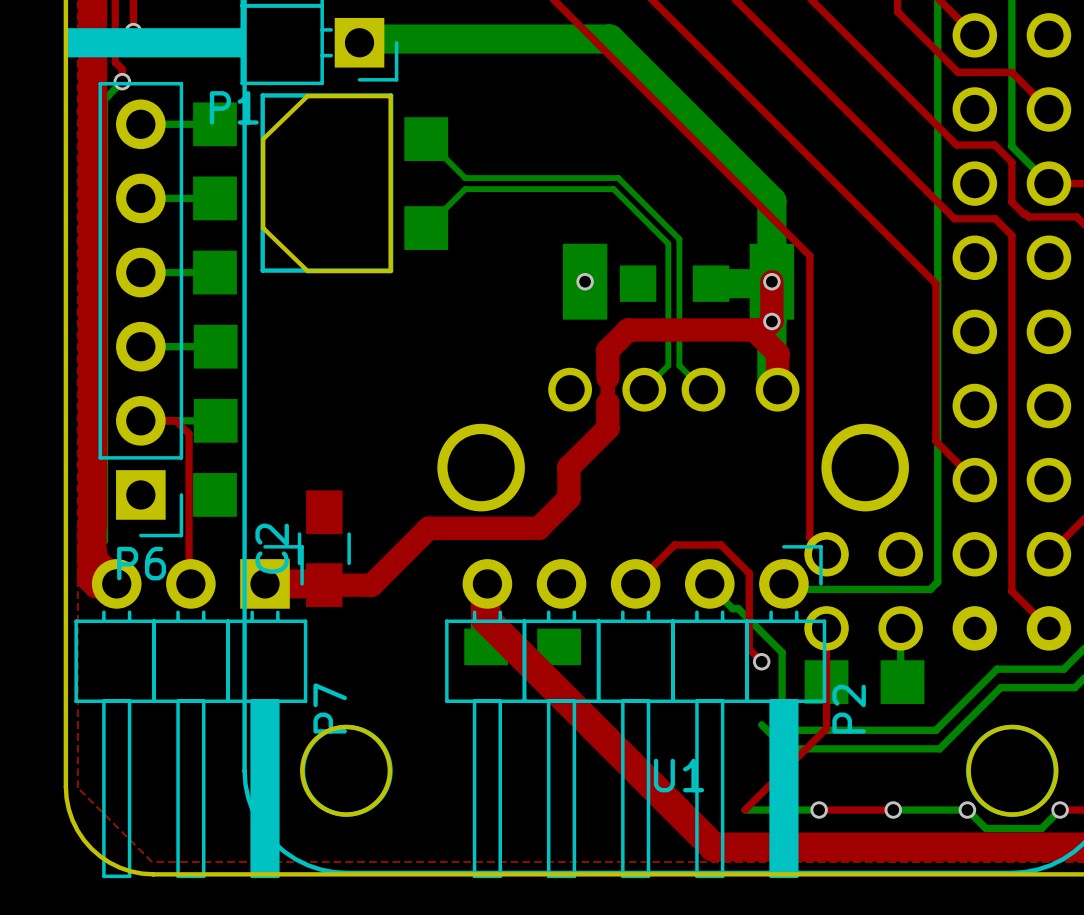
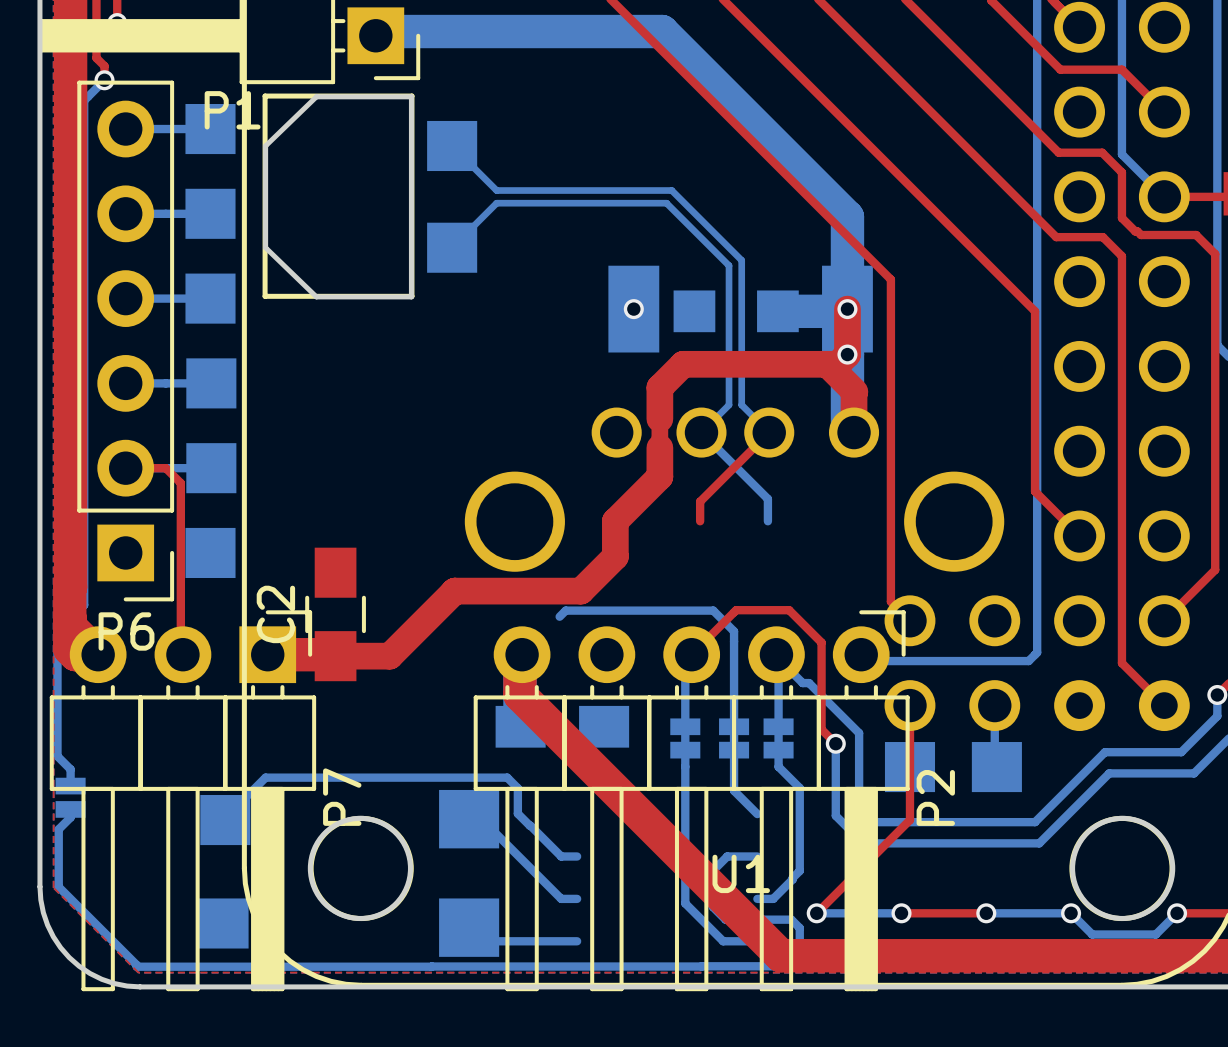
bottom track: none -> (701, 432) (767, 498) (767, 521)
top track: none -> (769, 432) (700, 501) (700, 521)
bottom track: none -> (559, 616) (565, 610) (713, 610) (734, 631) (734, 790) (757, 814)
bottom track: none -> (57, 631) (57, 756) (70, 769) (70, 786)
bottom track: none -> (685, 658) (685, 903) (723, 941) (773, 941)
bottom track: none -> (778, 658) (778, 766) (799, 788) (799, 870) (773, 898) (757, 898)
part: none -> (685, 738)
part: none -> (734, 738)
part: none -> (778, 738)
bottom track: none -> (835, 743) (835, 815)
part: none -> (70, 797)
bottom track: none -> (70, 809) (70, 817) (58, 829) (58, 887) (136, 966) (431, 966)
bottom track: none -> (225, 820) (265, 777) (507, 777) (517, 788) (517, 813) (529, 825)
part: none -> (225, 820)
bottom track: none -> (470, 824) (486, 824) (561, 898) (577, 898)
bottom track: none -> (530, 825) (561, 856) (577, 856)
bottom track: none -> (757, 856) (727, 856) (712, 870) (712, 906) (725, 919) (791, 919) (799, 928) (799, 957) (791, 966) (701, 966)
part: none -> (469, 873)
via: none -> (816, 913)
part: none -> (223, 923)
bottom track: none -> (470, 932) (479, 941) (577, 941)
bottom track: none -> (431, 966) (701, 966)

